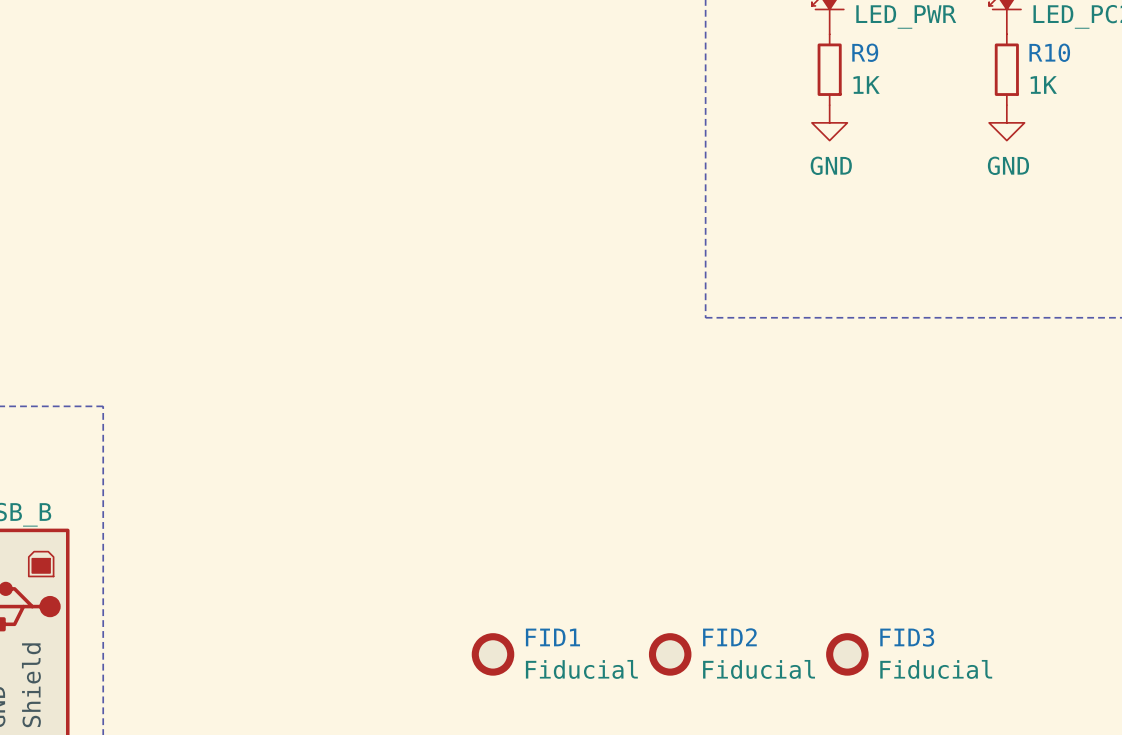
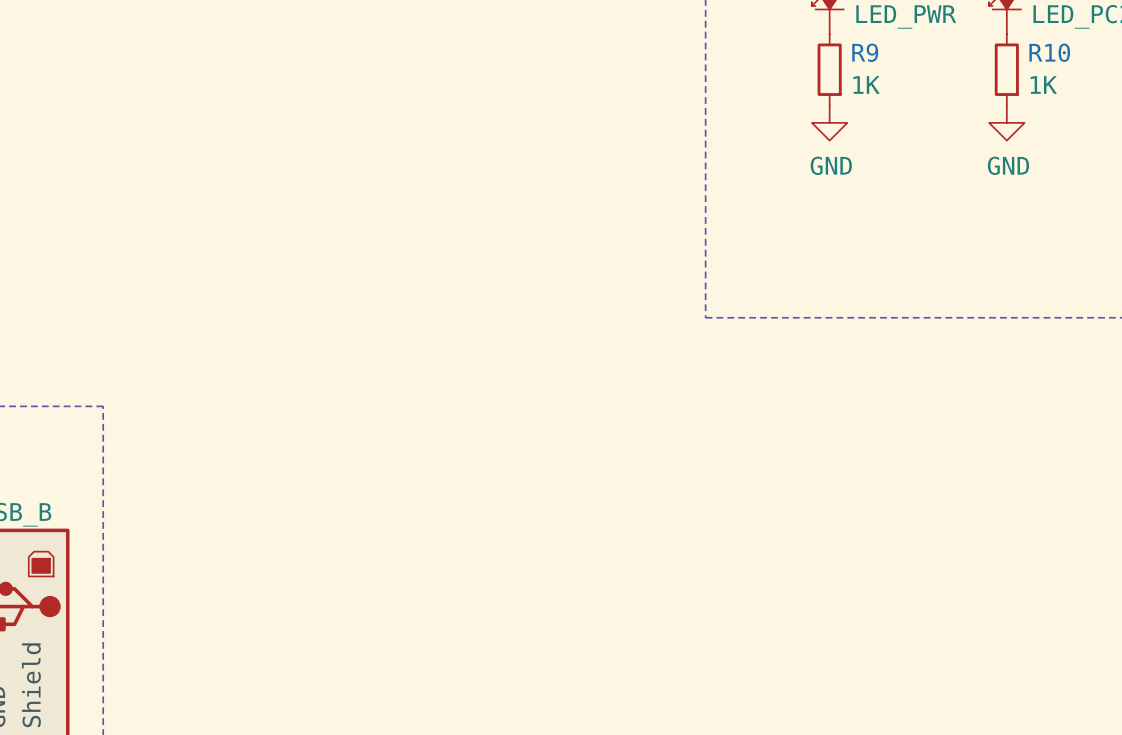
FID1: Fiducial (493, 654) -> none
FID2: Fiducial (670, 654) -> none
FID3: Fiducial (847, 654) -> none

